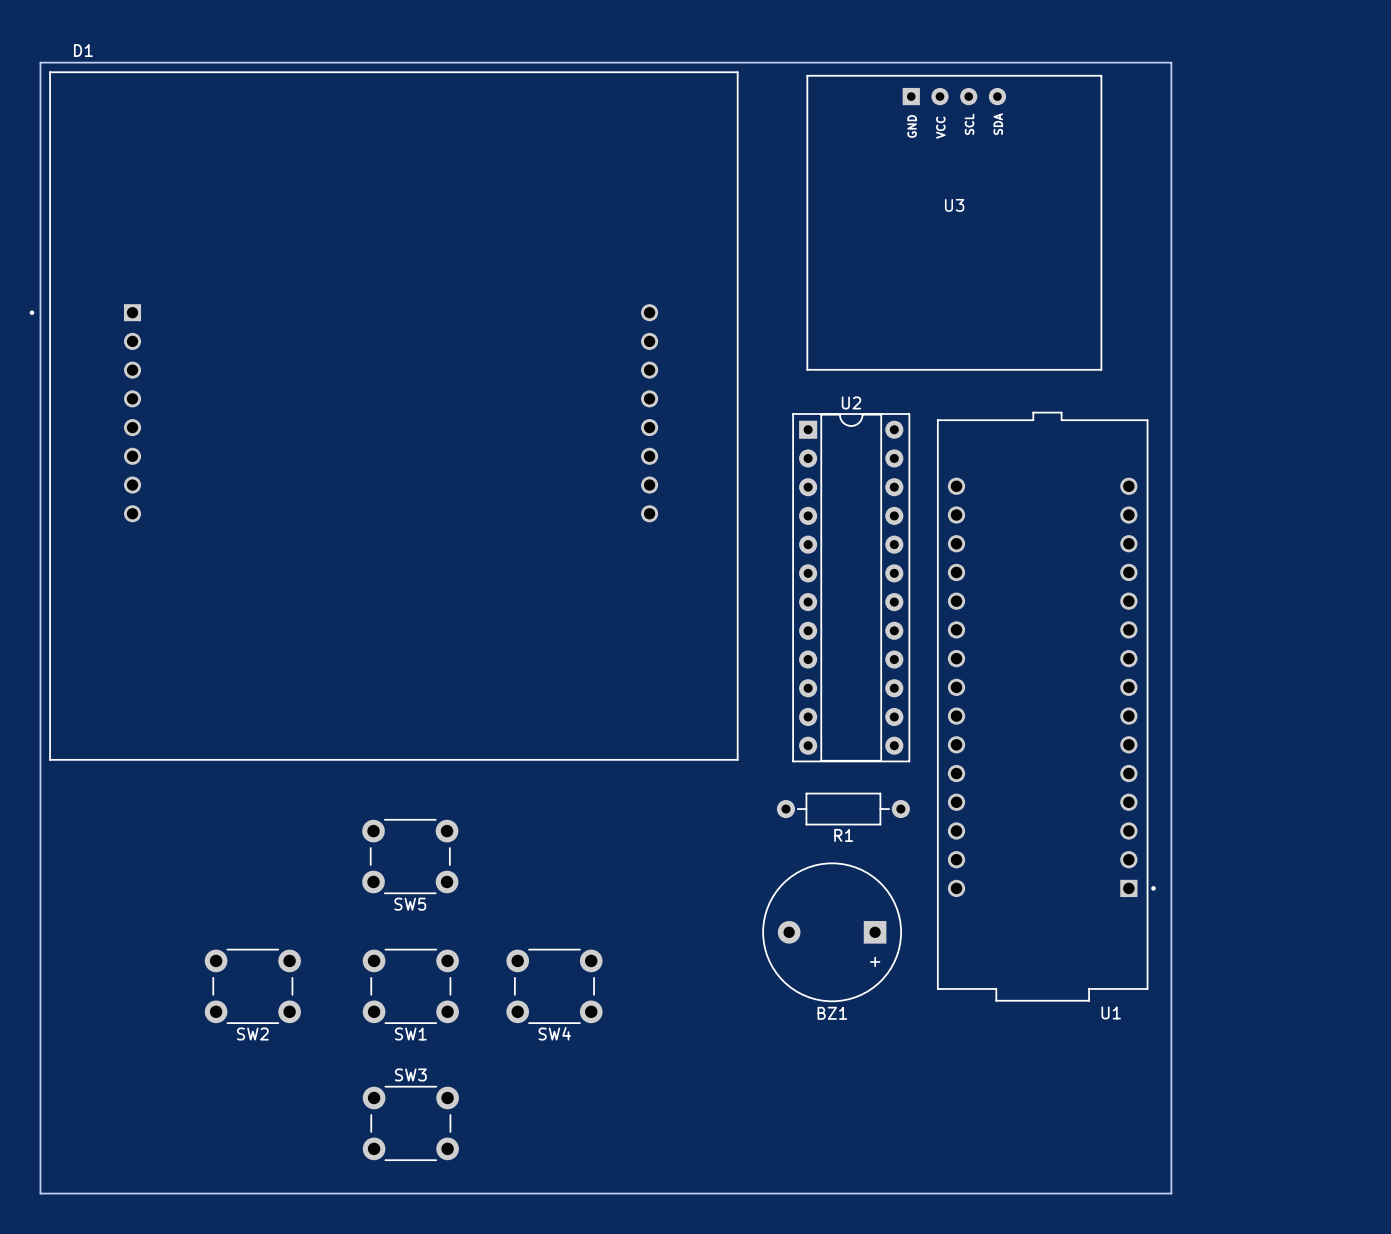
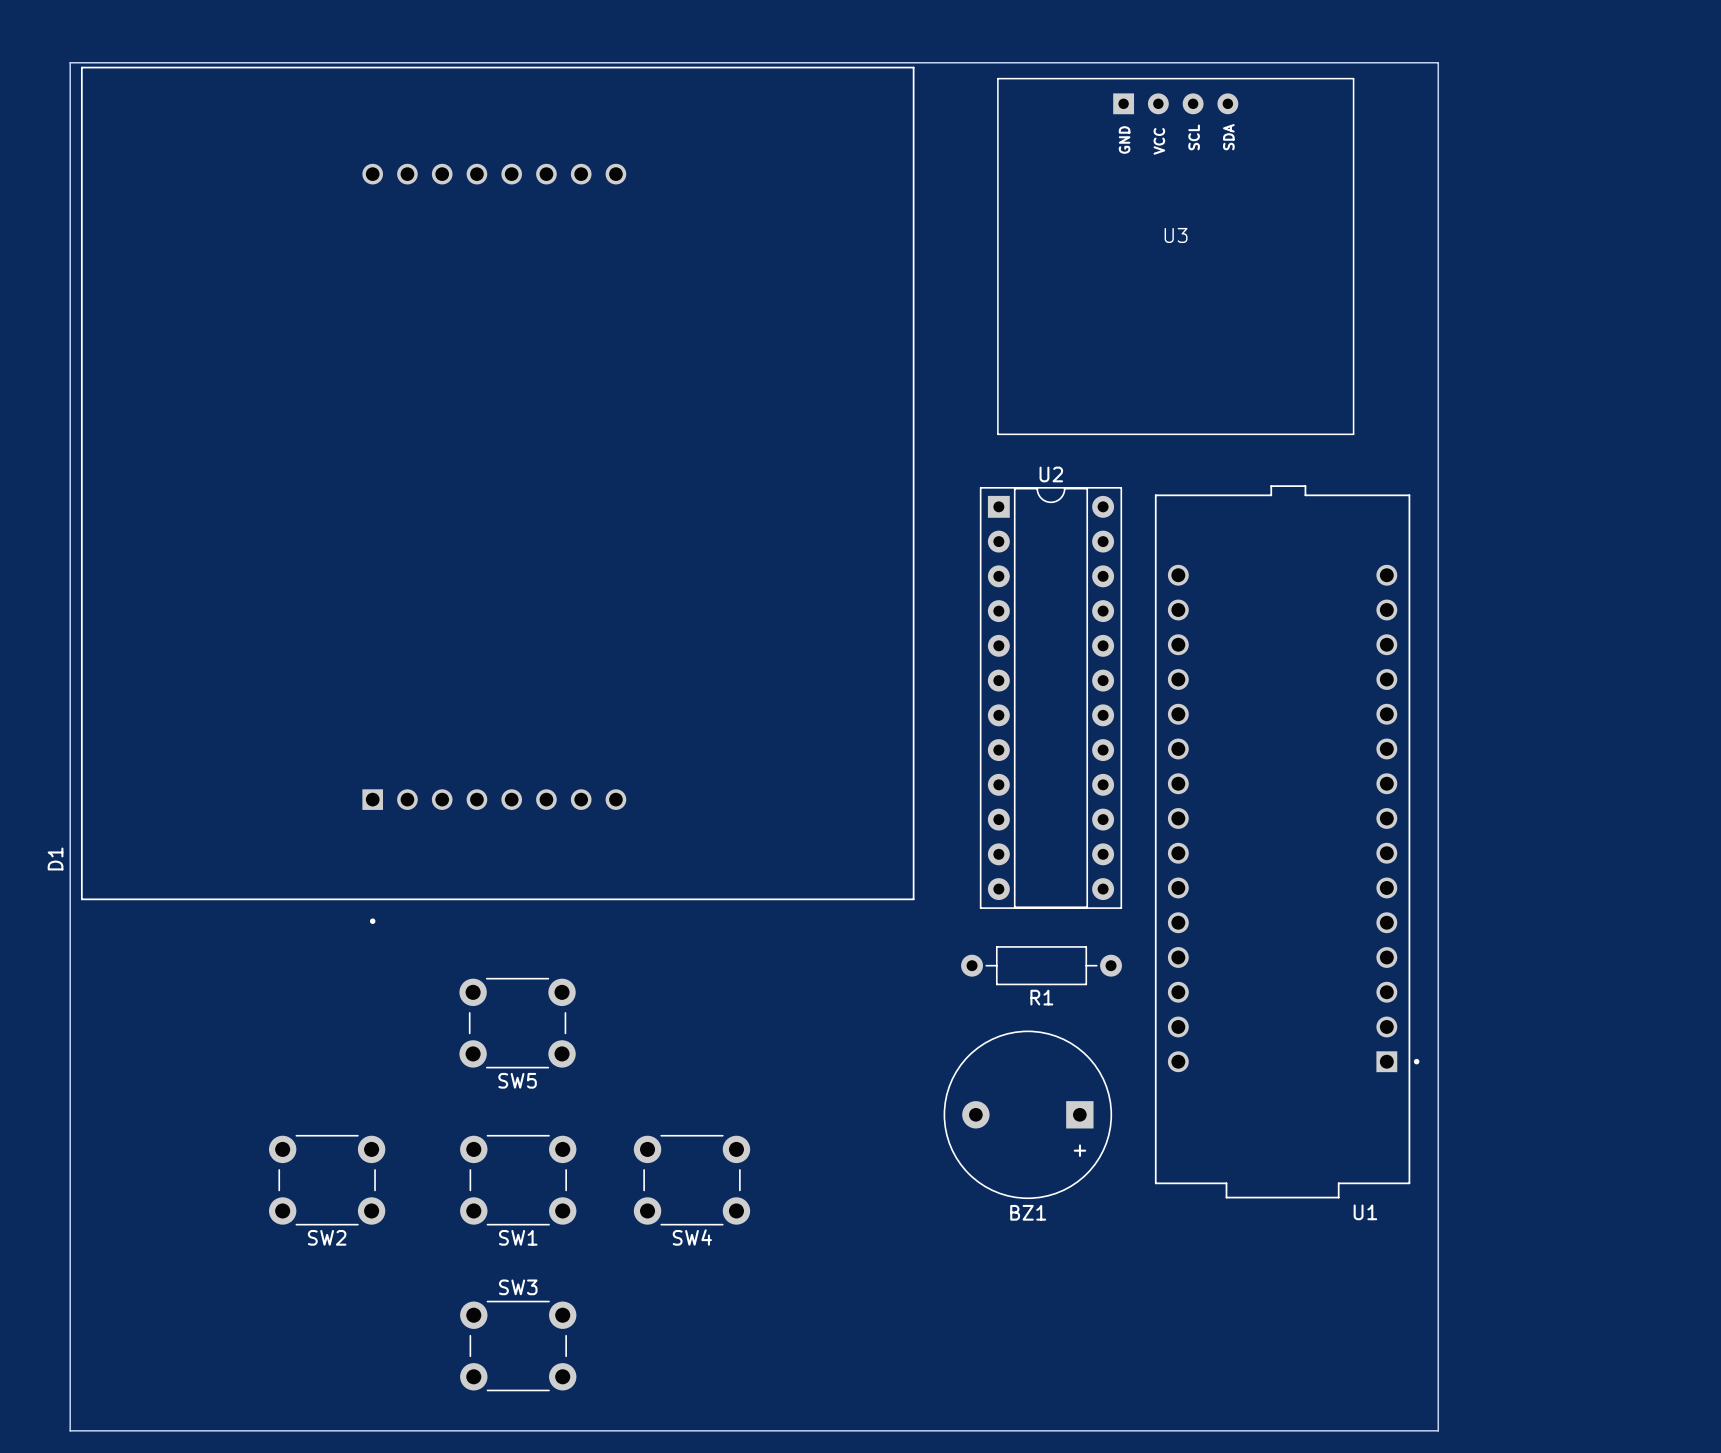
D1 rotation: 0° (384, 416) -> 90° counterclockwise (497, 495)

